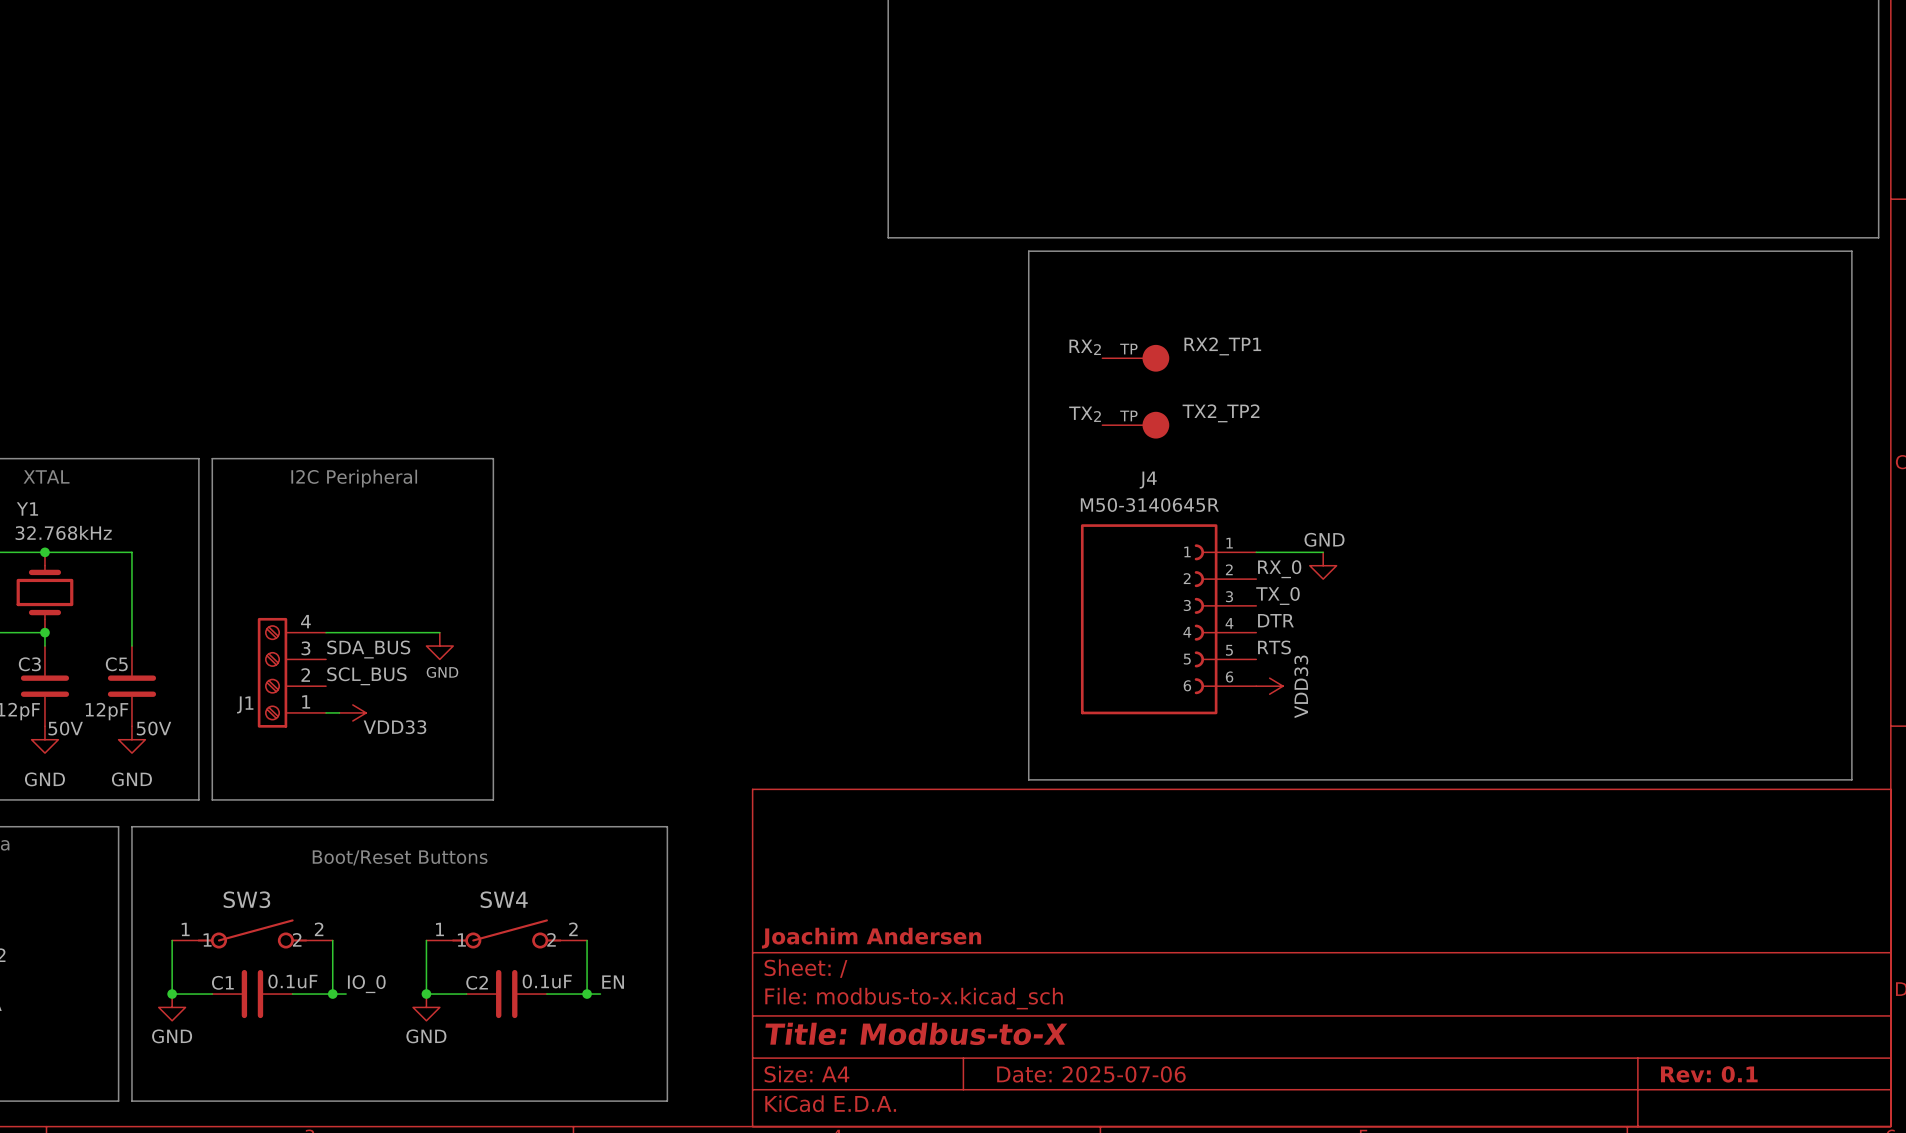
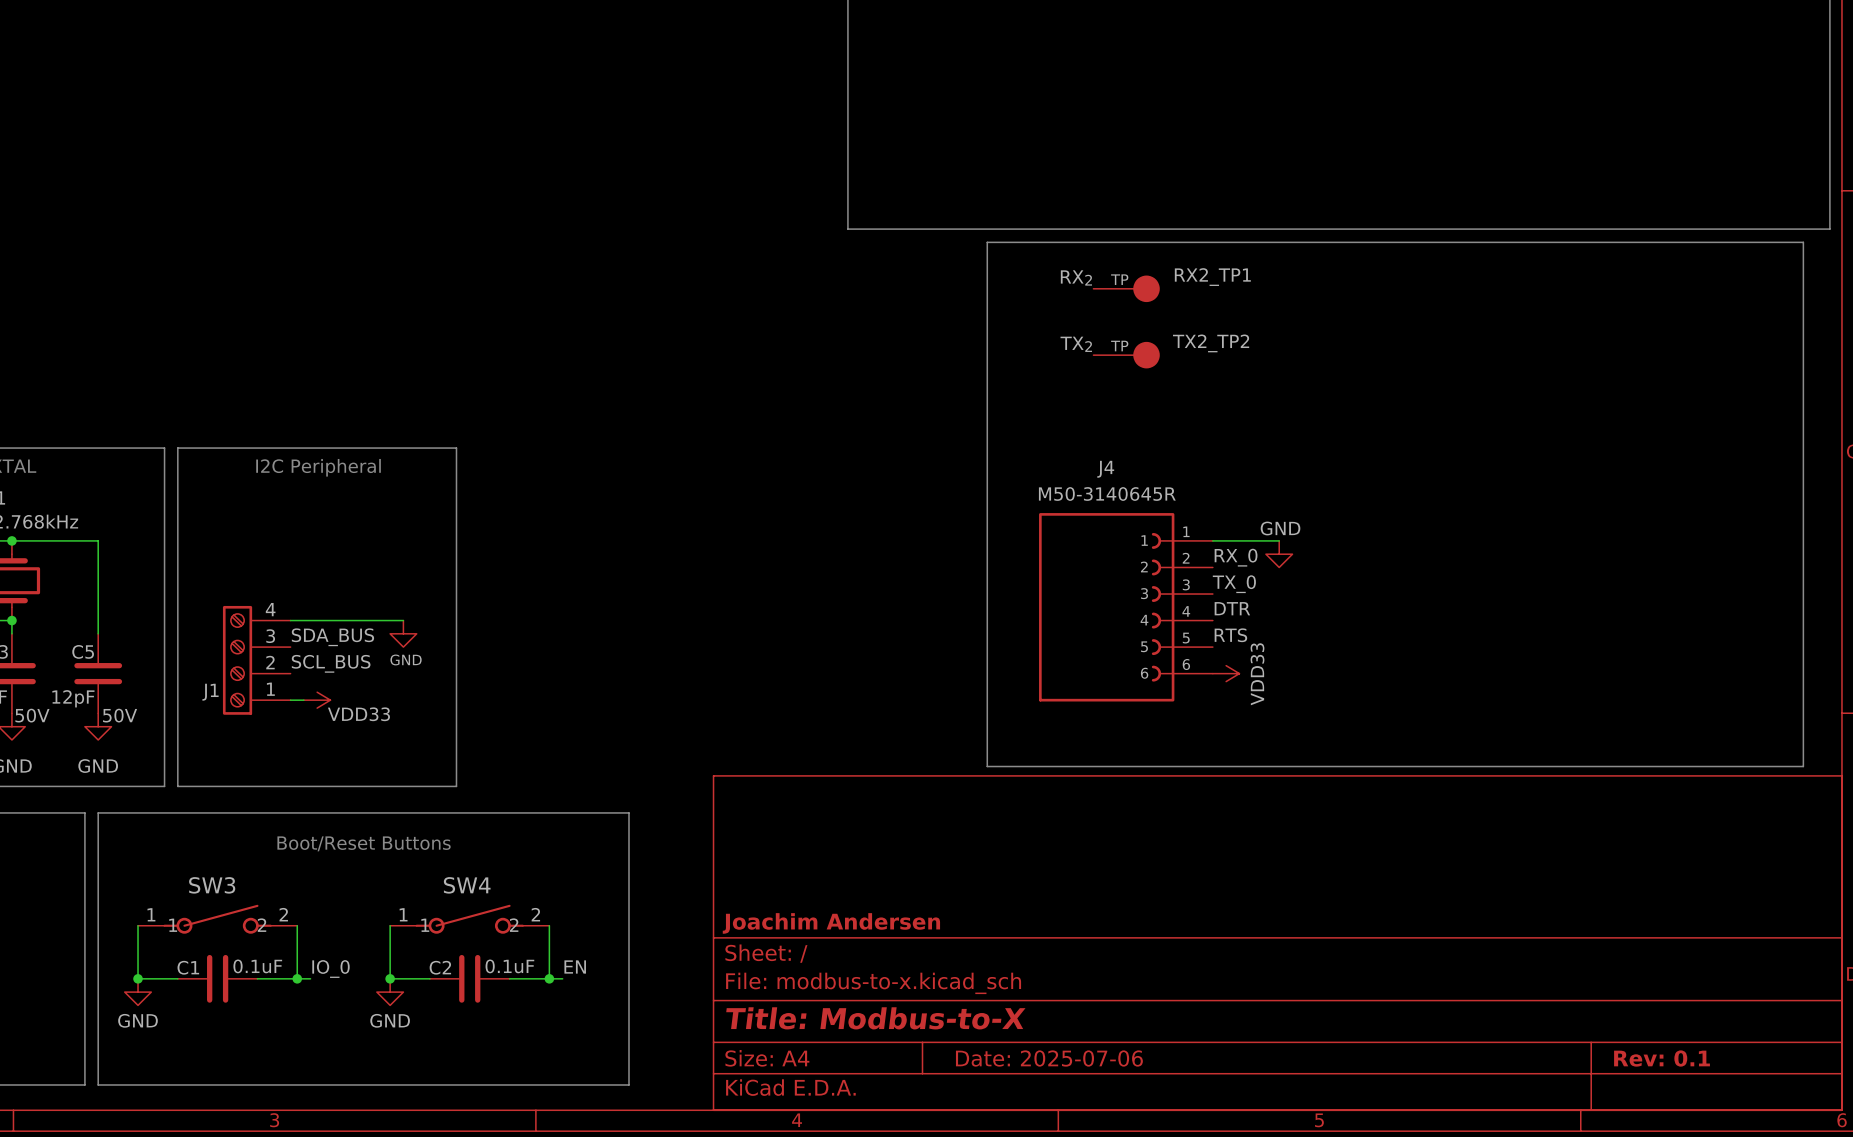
label position: RX2 (1085, 347) -> RX2 (1076, 277)
RX2_TP1 position: (1135, 358) -> (1126, 288)
label position: TX2 (1085, 414) -> TX2 (1076, 344)
TX2_TP2 position: (1135, 425) -> (1126, 355)

